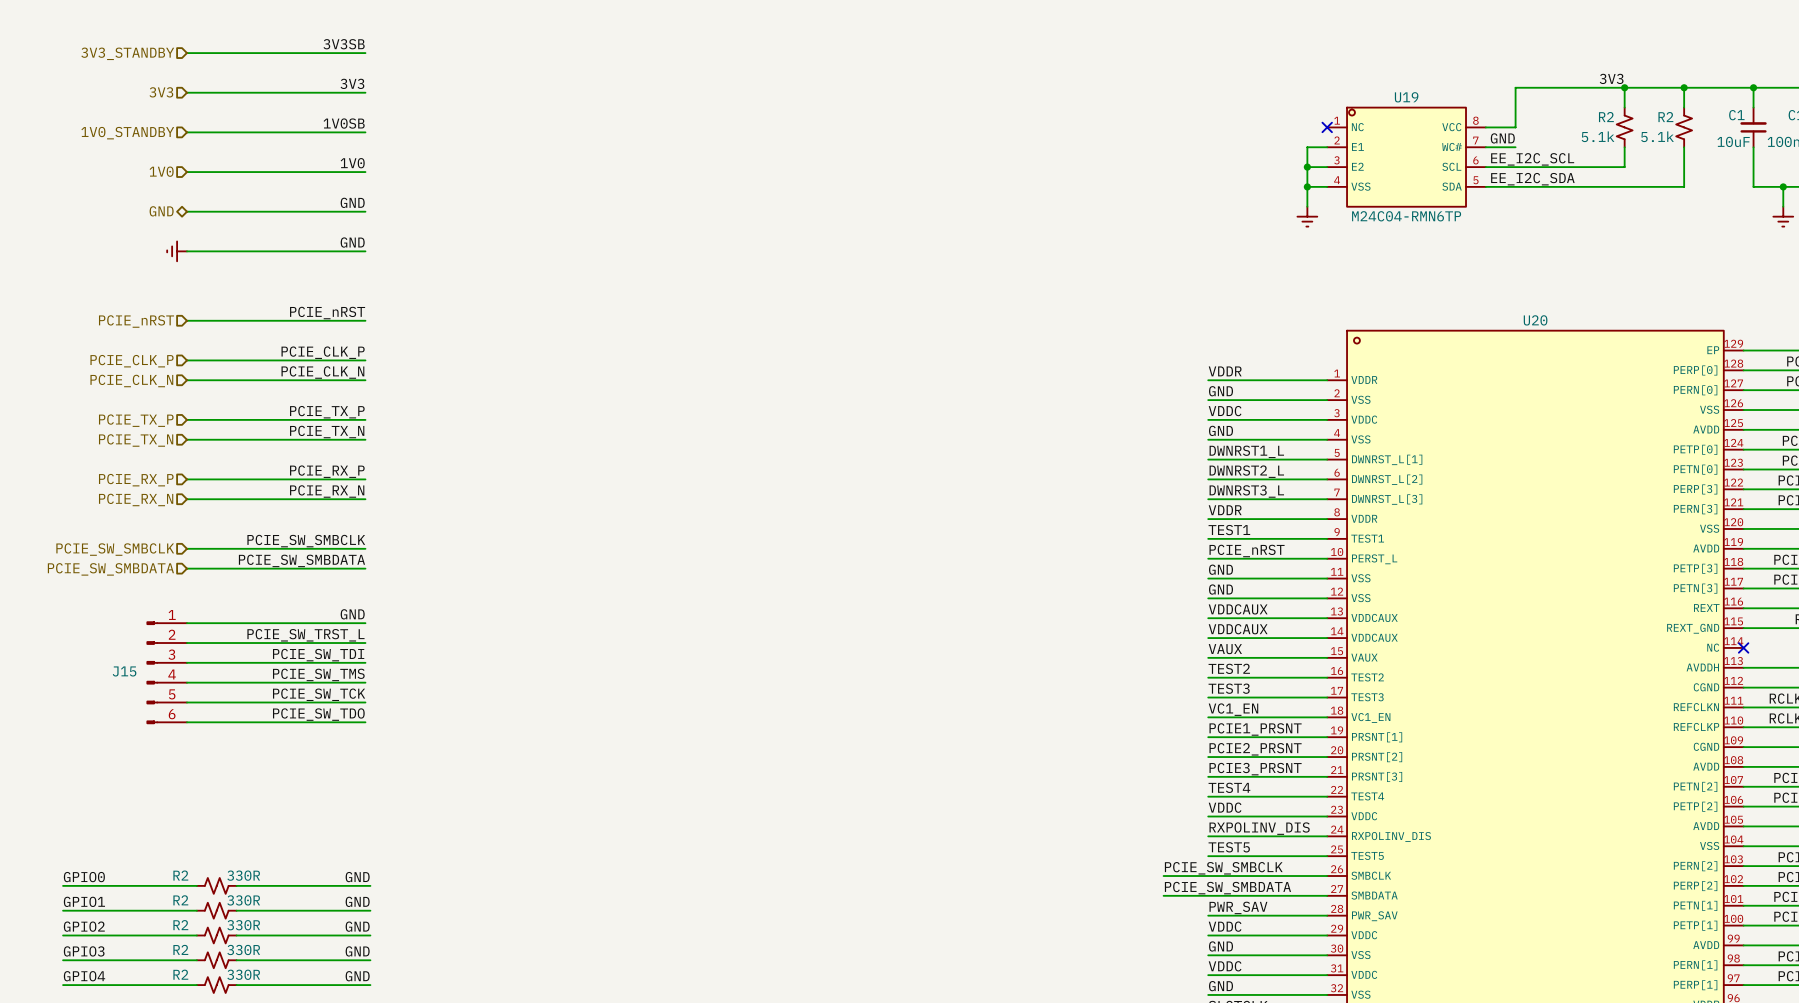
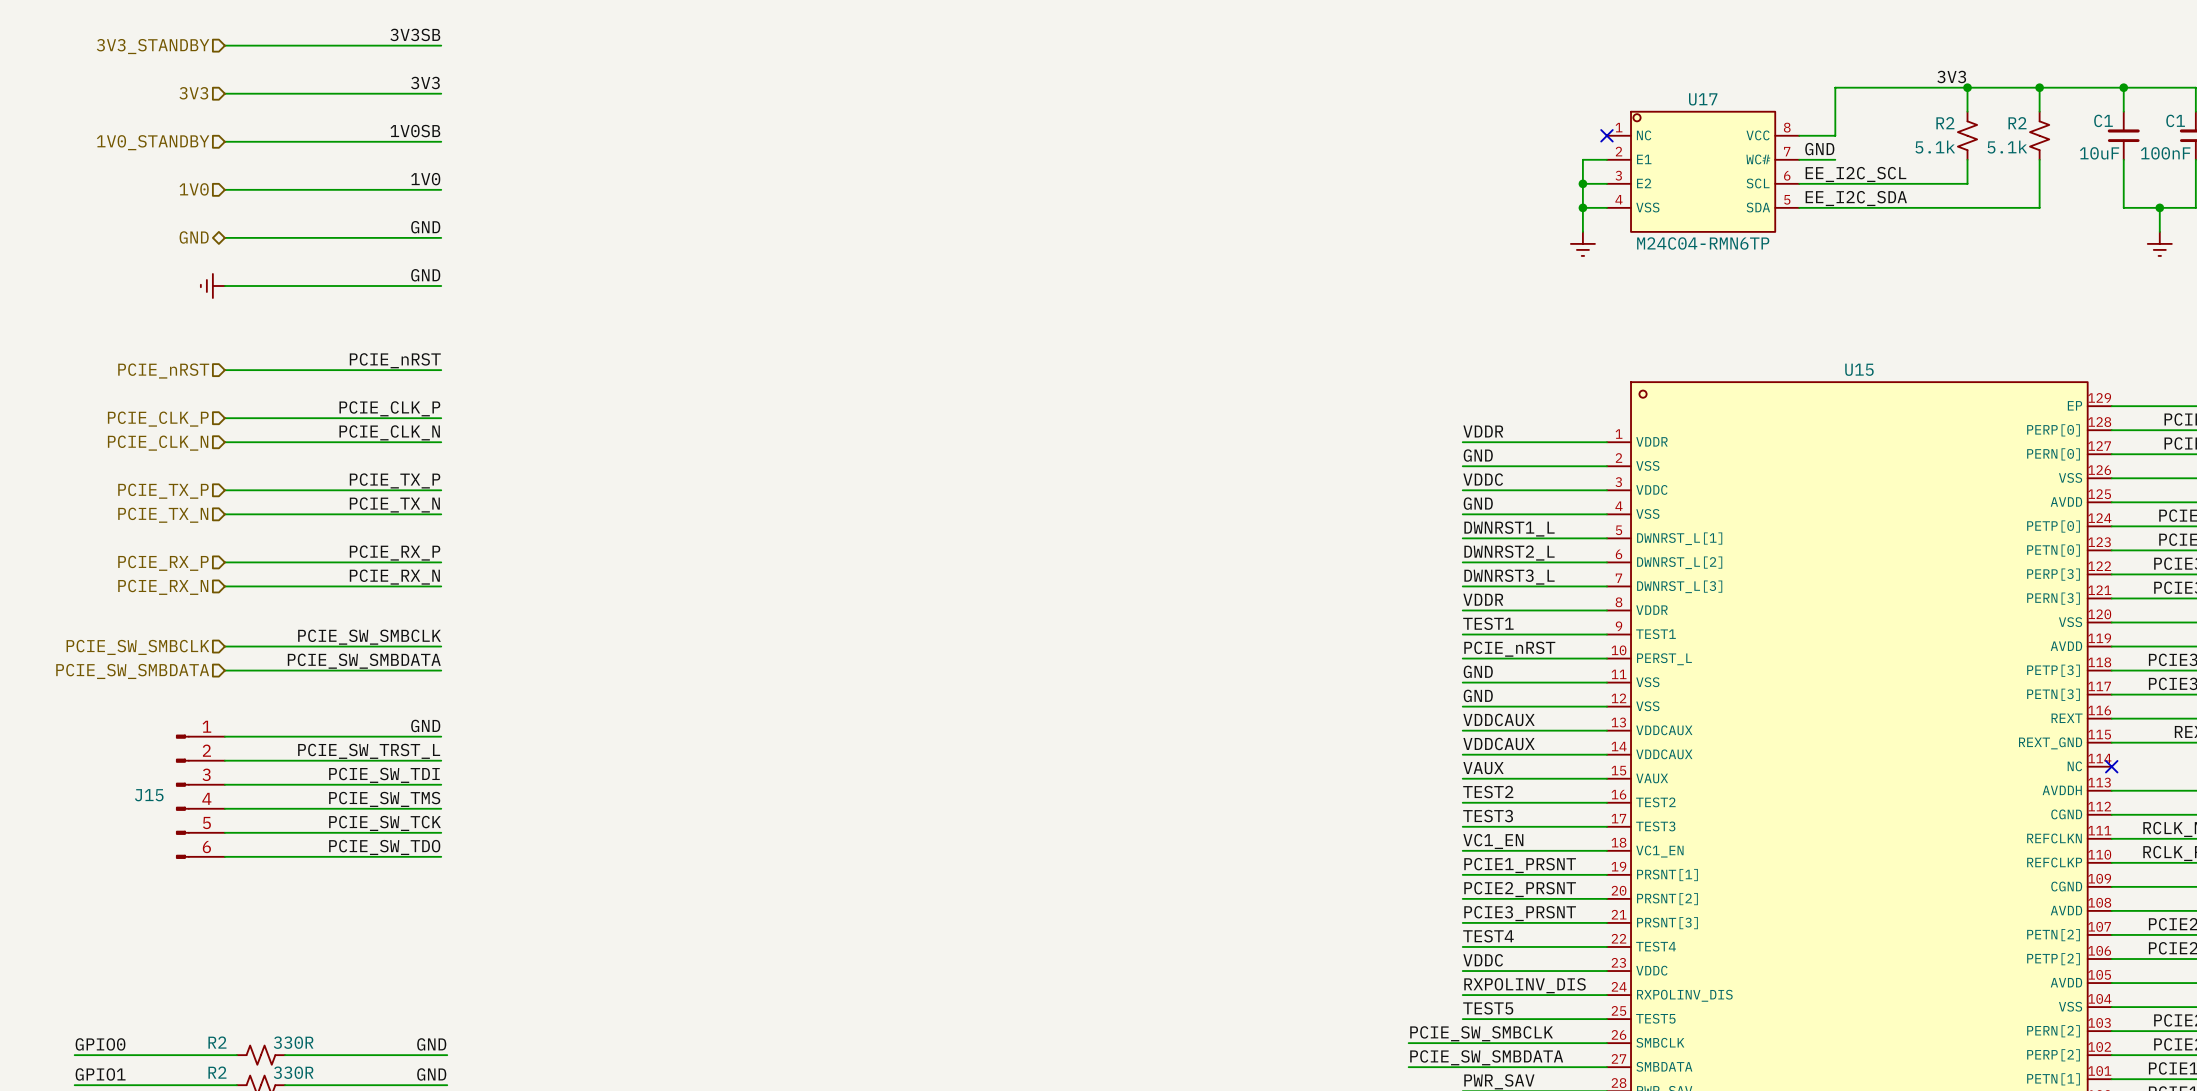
U19 name: U19 (1406, 97) -> U17 (1703, 99)
U20 name: U20 (1535, 320) -> U15 (1859, 369)

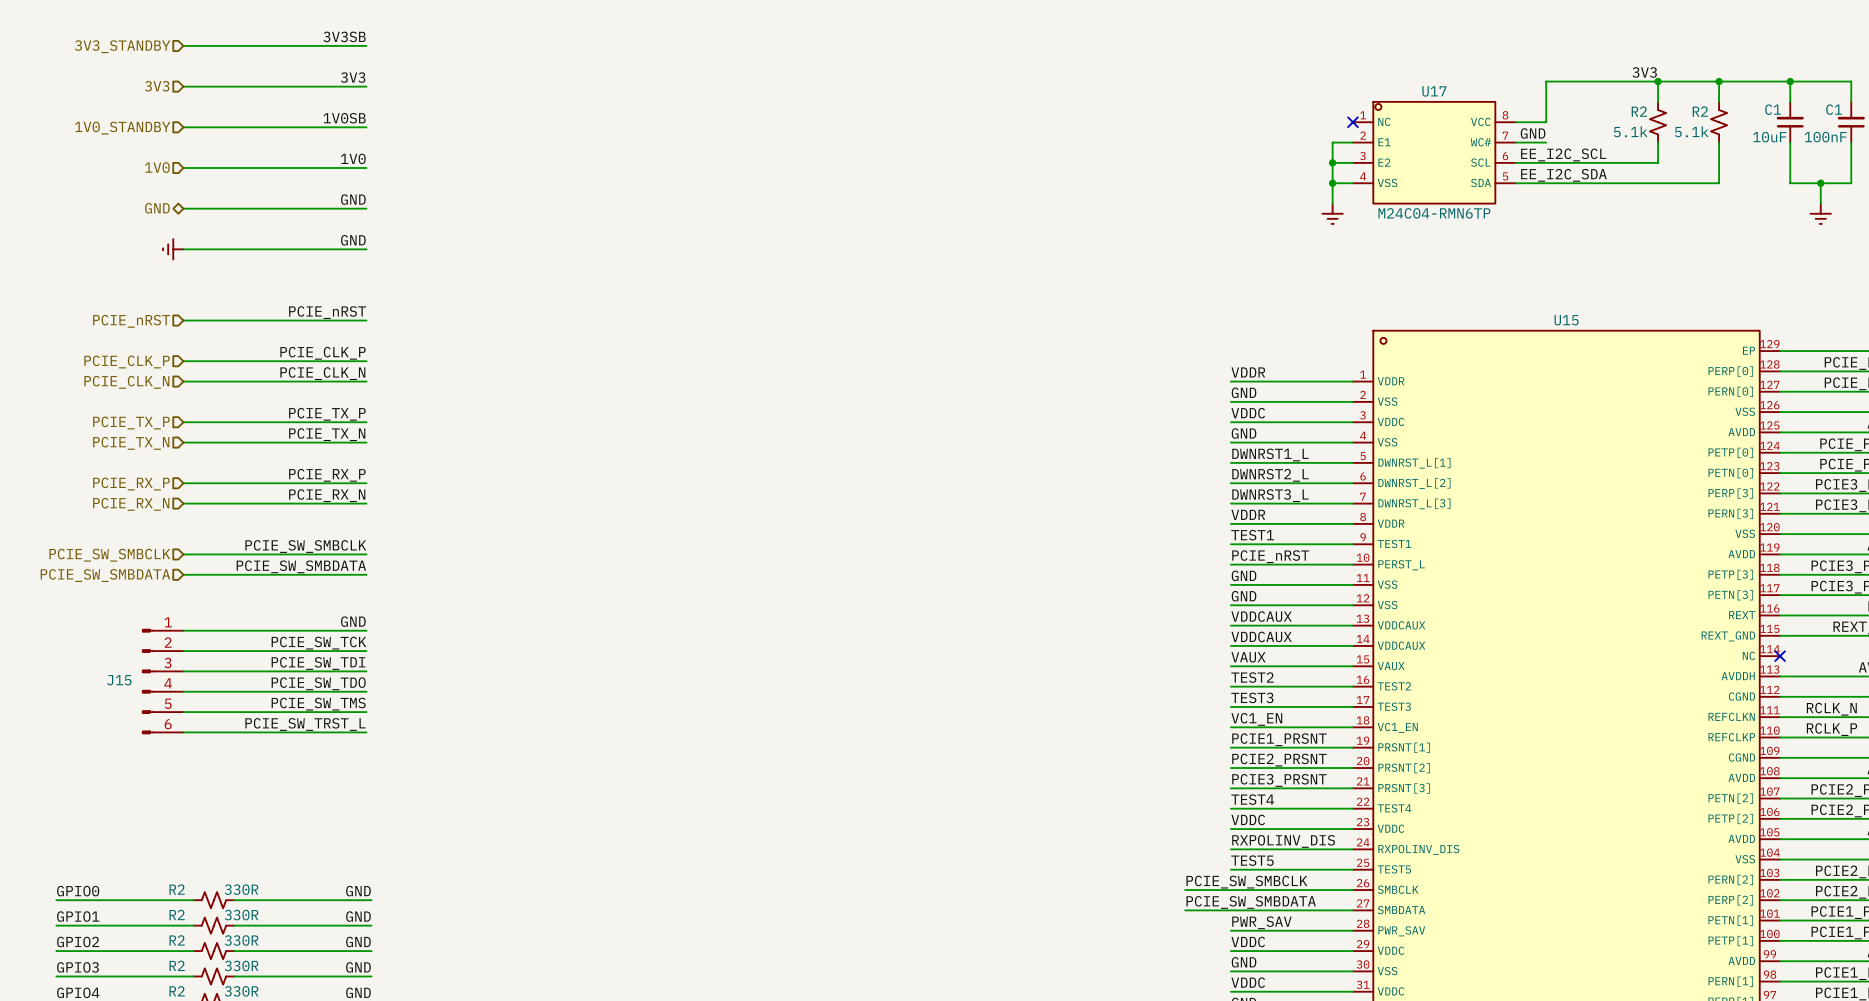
label: PCIE_SW_TRST_L (369, 751) -> PCIE_SW_TCK (318, 643)
label: PCIE_SW_TMS (384, 799) -> PCIE_SW_TDO (318, 683)
label: PCIE_SW_TCK (384, 823) -> PCIE_SW_TMS (318, 704)
label: PCIE_SW_TDO (384, 847) -> PCIE_SW_TRST_L (305, 724)

